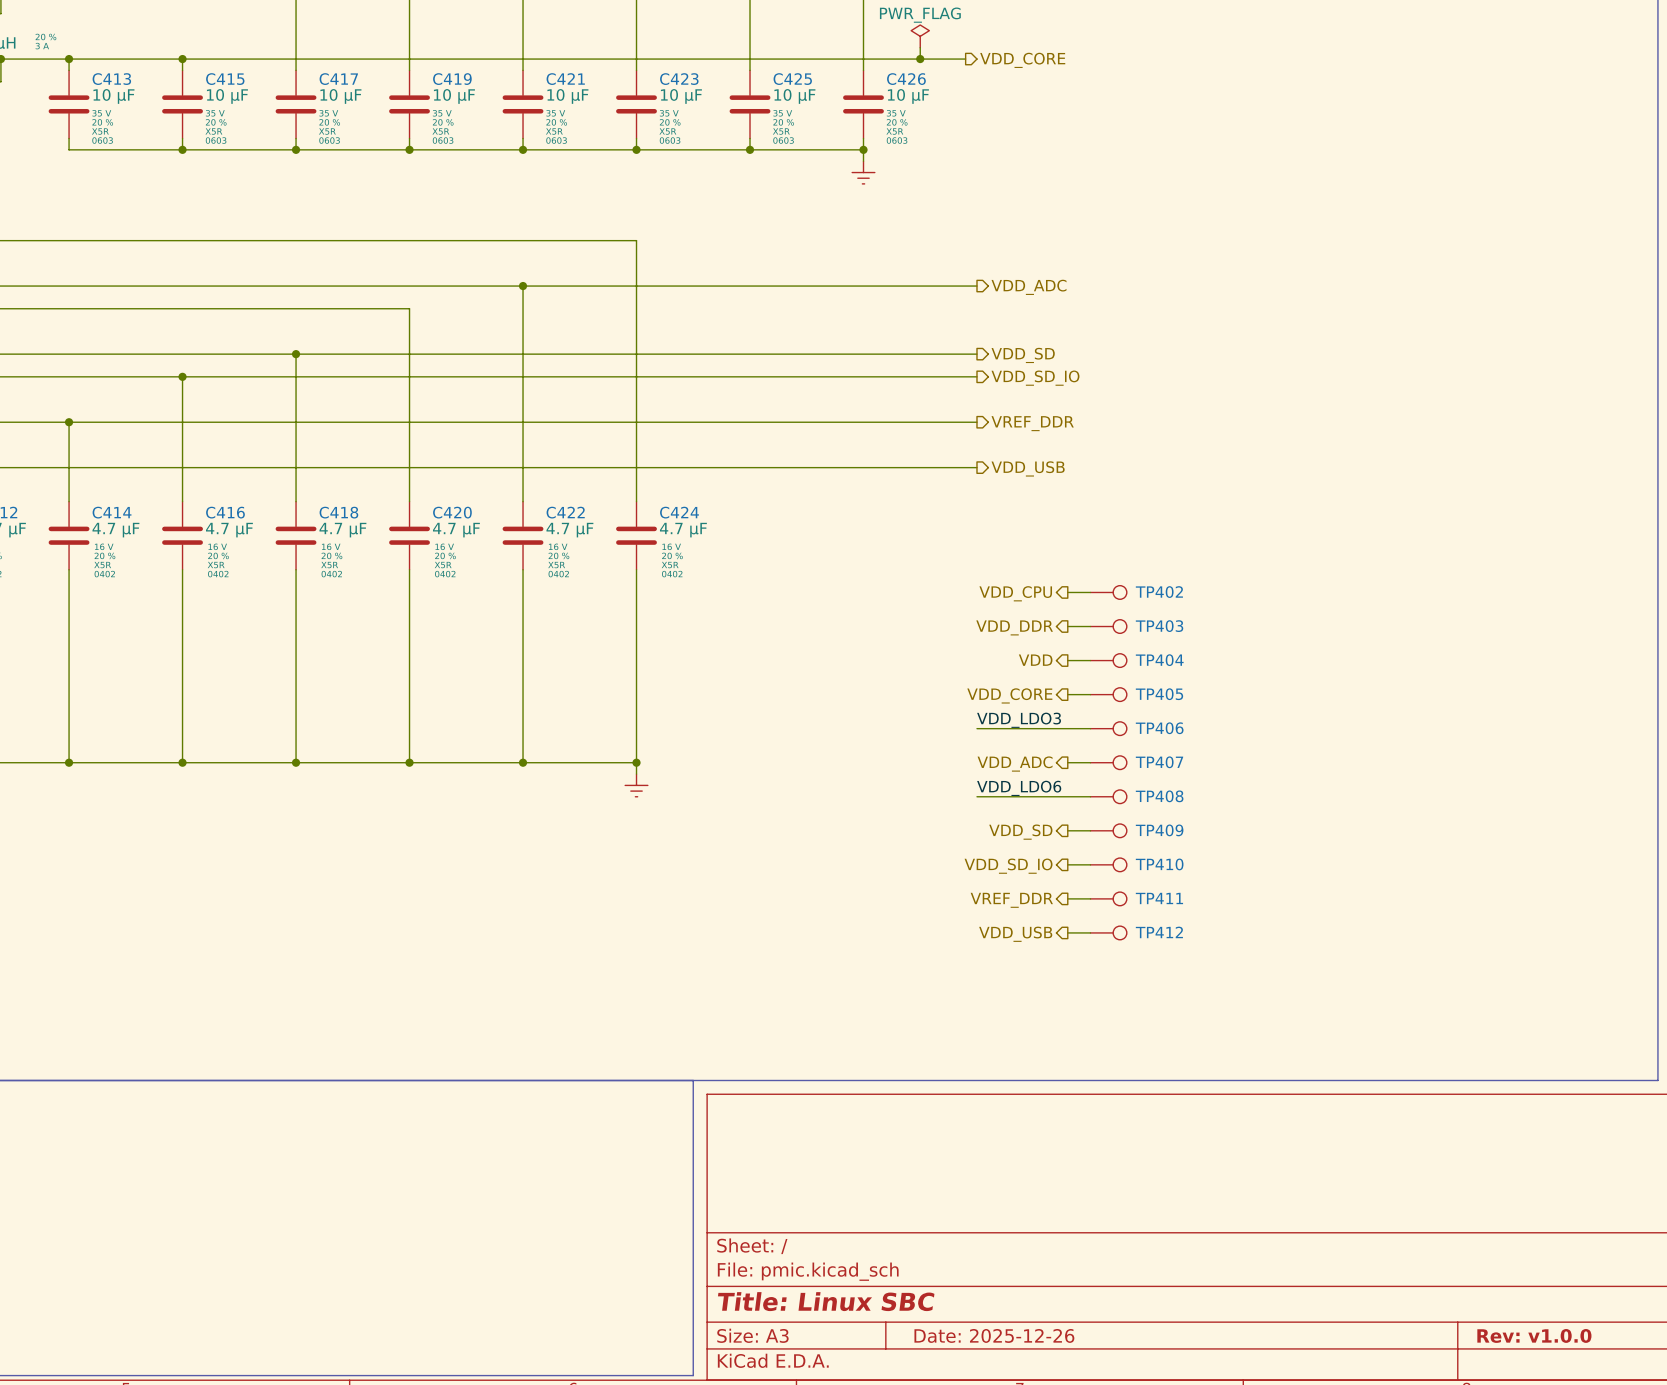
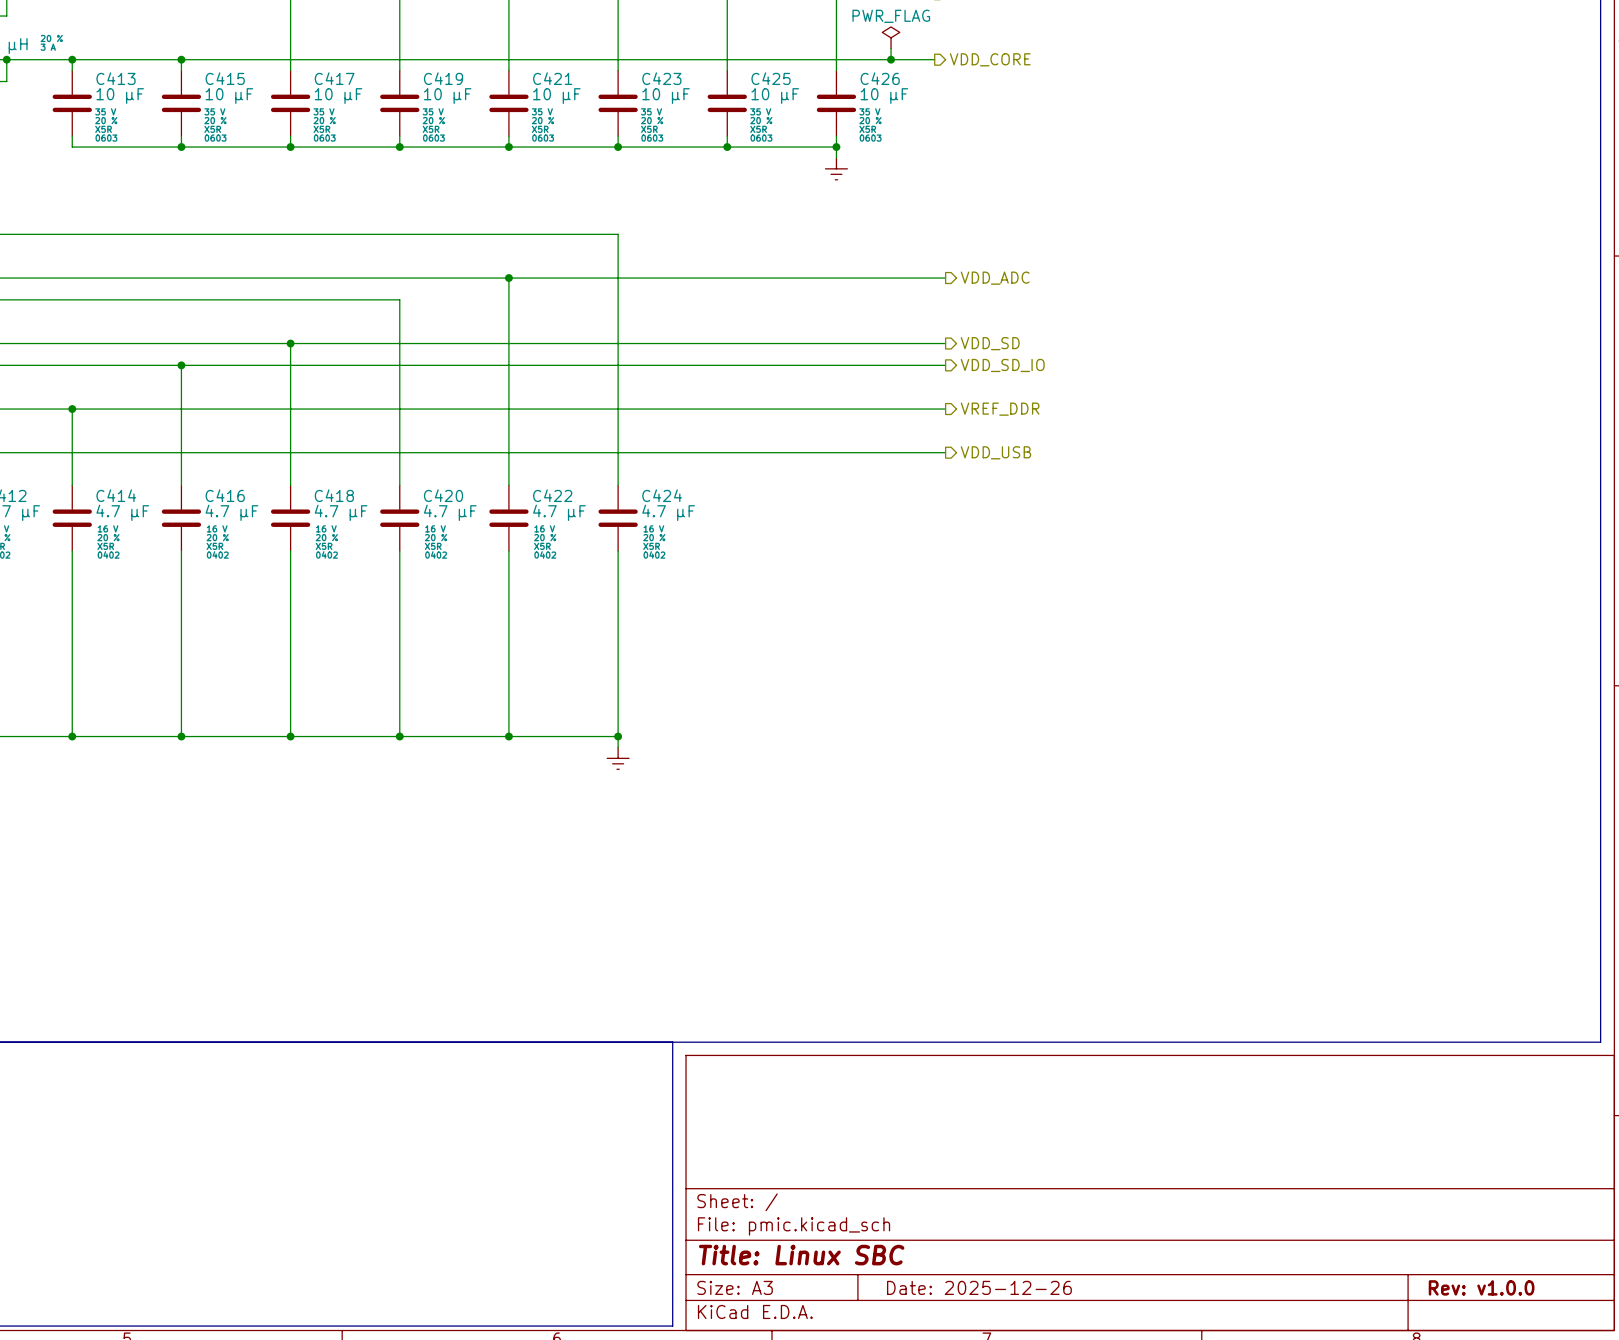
wire: (1067, 592) (1090, 592) -> none
TP402: (1108, 592) -> none
hierarchical label: VDD_CPU (1015, 593) -> none
wire: (1067, 626) (1090, 626) -> none
TP403: (1108, 626) -> none
hierarchical label: VDD_DDR (1014, 627) -> none
hierarchical label: VDD (1035, 660) -> none
wire: (1067, 660) (1090, 660) -> none
TP404: (1108, 660) -> none
wire: (1067, 694) (1090, 694) -> none
TP405: (1108, 694) -> none
hierarchical label: VDD_CORE (1009, 695) -> none
label: VDD_LDO3 (1019, 720) -> none
wire: (976, 728) (1090, 728) -> none
TP406: (1108, 728) -> none
wire: (1067, 762) (1090, 762) -> none
TP407: (1108, 762) -> none
hierarchical label: VDD_ADC (1015, 764) -> none
label: VDD_LDO6 (1019, 788) -> none
wire: (976, 796) (1090, 796) -> none
TP408: (1108, 796) -> none
wire: (1067, 830) (1090, 830) -> none
TP409: (1108, 830) -> none
hierarchical label: VDD_SD (1020, 832) -> none
wire: (1067, 864) (1090, 864) -> none
TP410: (1108, 864) -> none
hierarchical label: VDD_SD_IO (1008, 866) -> none
wire: (1067, 898) (1090, 898) -> none
TP411: (1108, 898) -> none
hierarchical label: VREF_DDR (1011, 900) -> none
wire: (1067, 932) (1090, 932) -> none
TP412: (1108, 932) -> none
hierarchical label: VDD_USB (1015, 934) -> none

